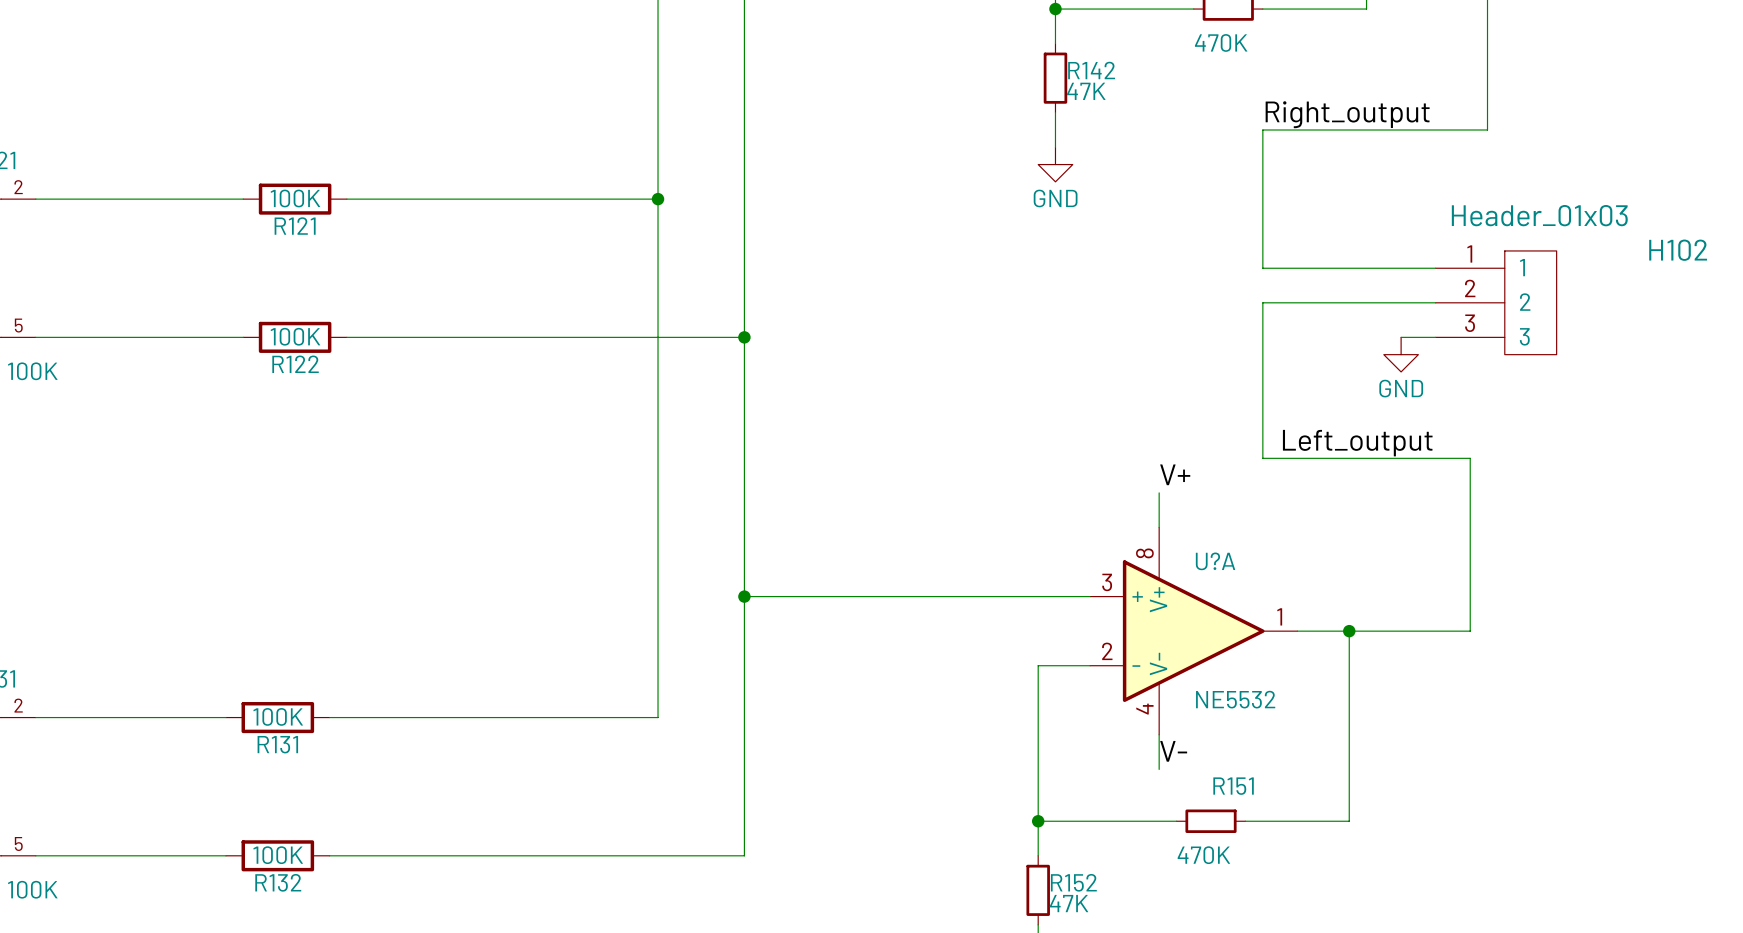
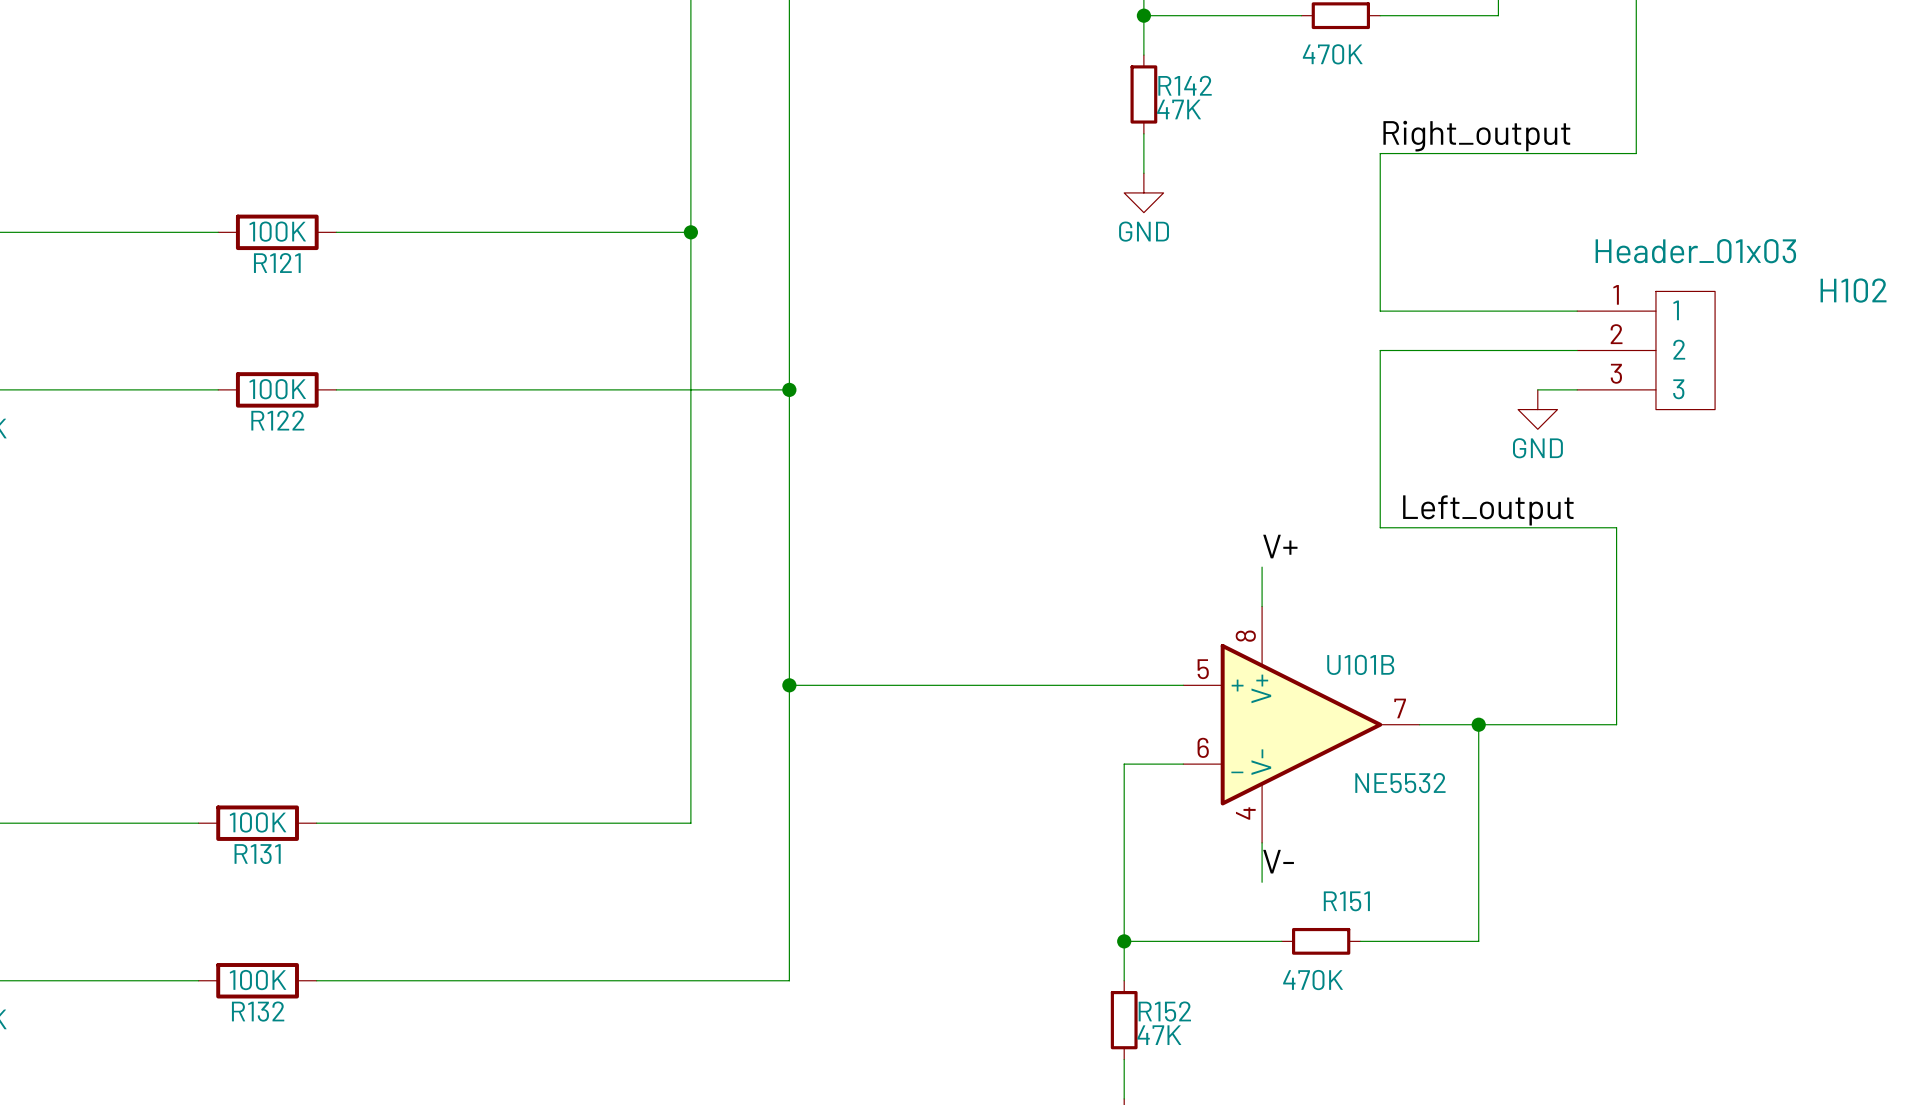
U?A name: U?A (1215, 561) -> U101B (1360, 664)
U?A pin number: 3 (1107, 582) -> 5 (1203, 669)
U?A pin number: 1 (1279, 616) -> 7 (1400, 708)
U?A pin number: 2 (1107, 651) -> 6 (1203, 747)
U?A pin name: - (1136, 666) -> _ (1237, 772)
U?A value position: NE5532 (1235, 699) -> NE5532 (1400, 783)

